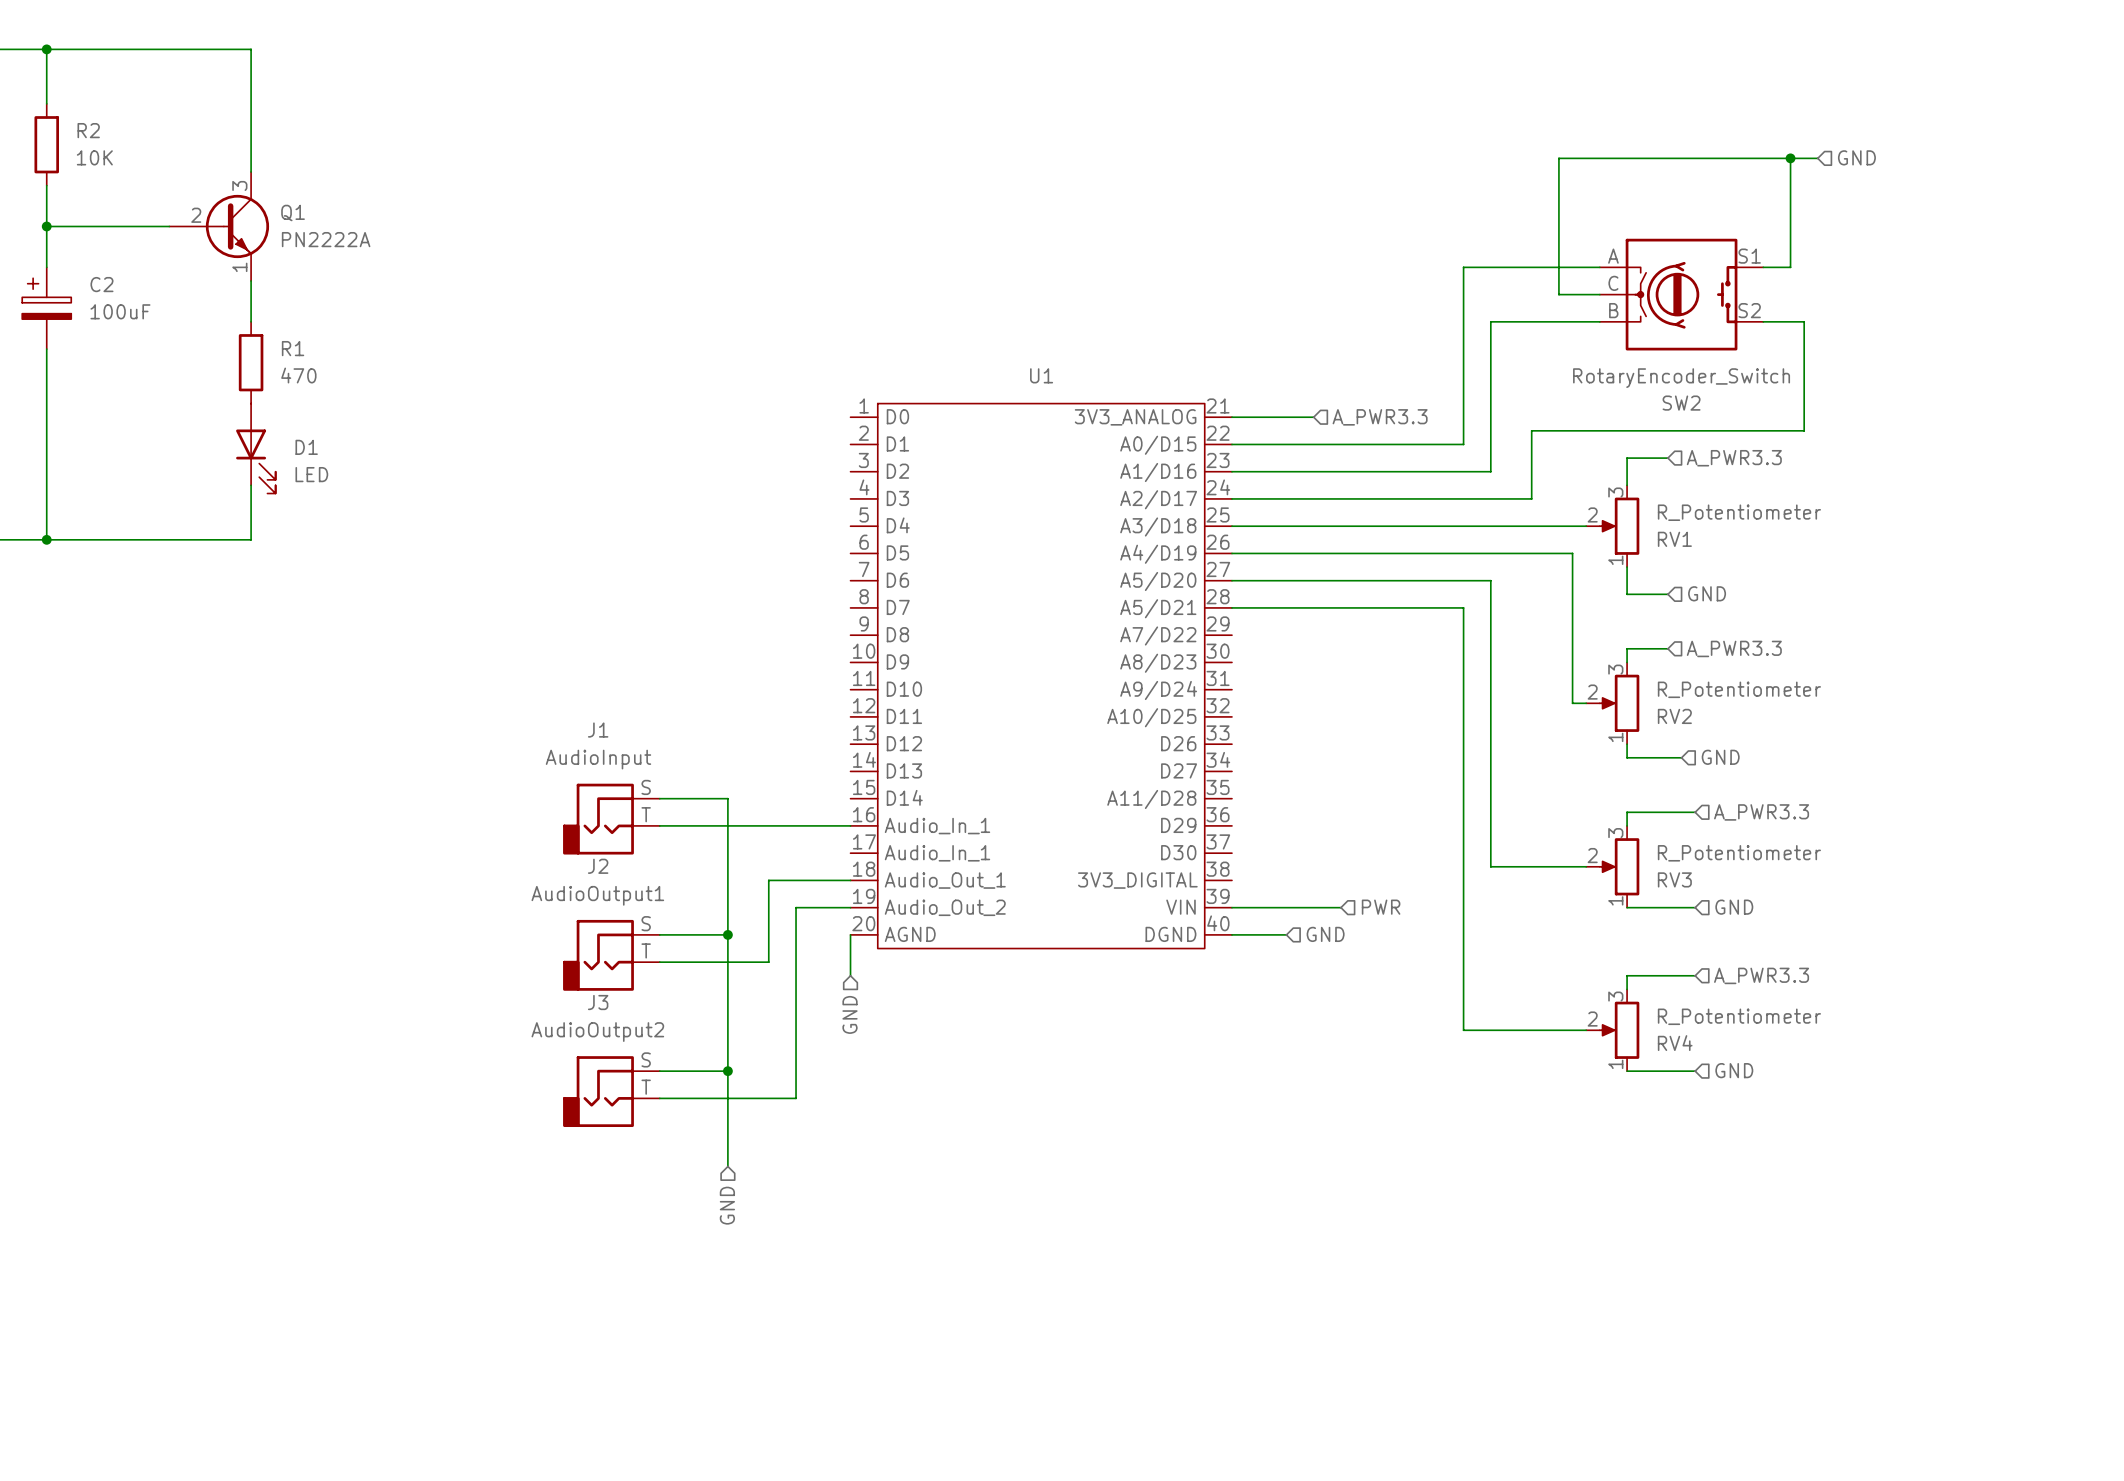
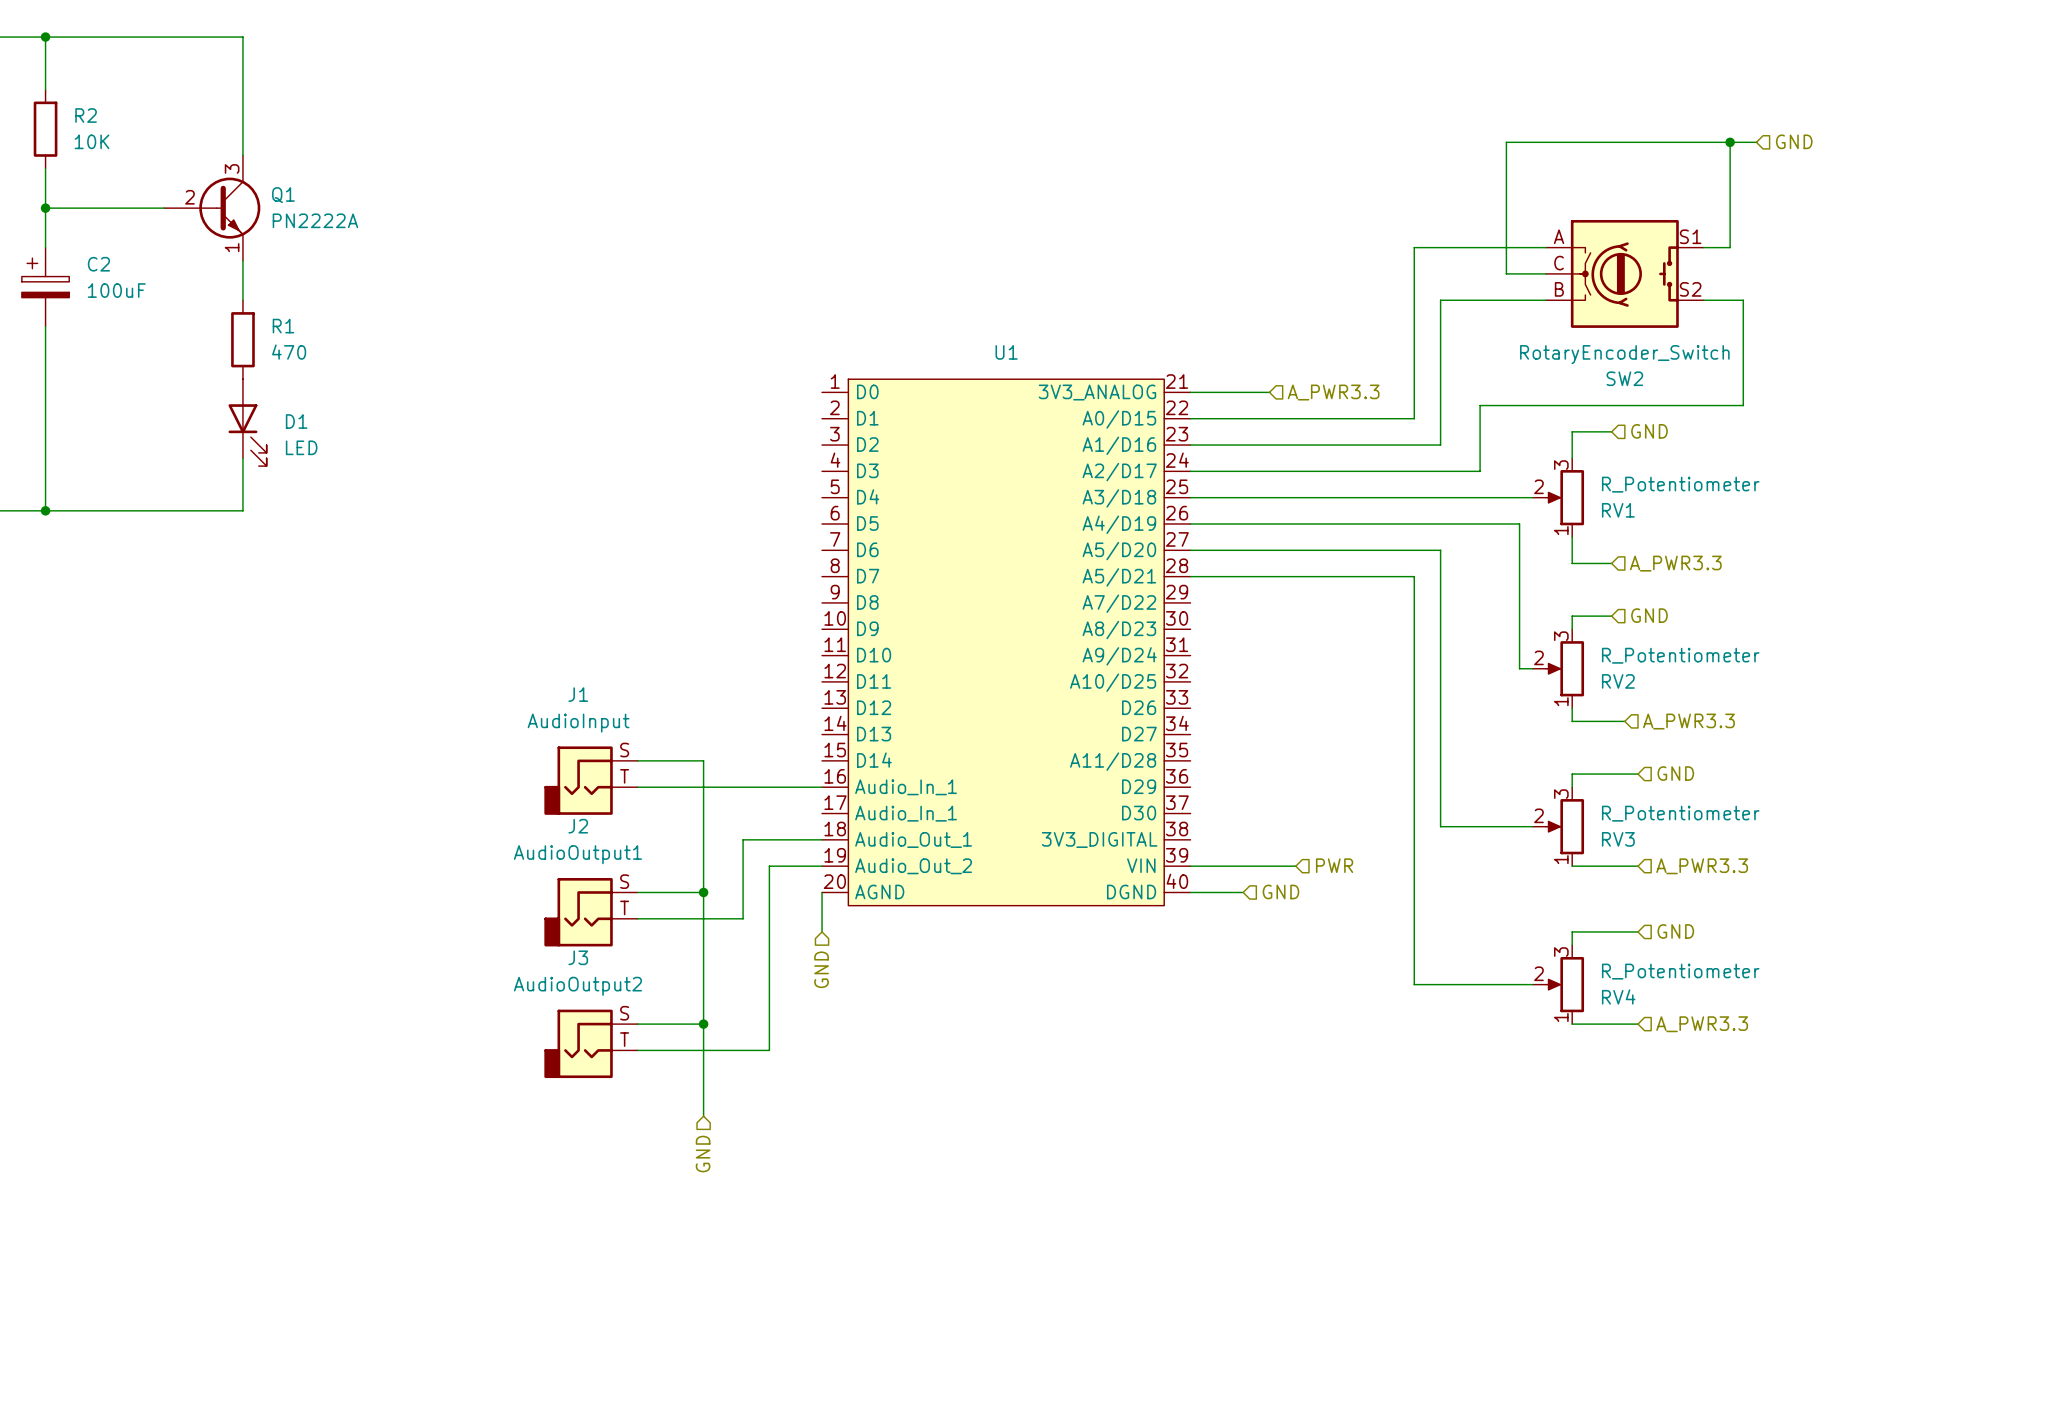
hierarchical label: A_PWR3.3 (1734, 458) -> GND (1649, 431)
hierarchical label: GND (1707, 593) -> A_PWR3.3 (1675, 563)
hierarchical label: A_PWR3.3 (1734, 648) -> GND (1649, 615)
hierarchical label: GND (1720, 757) -> A_PWR3.3 (1688, 721)
hierarchical label: A_PWR3.3 (1761, 812) -> GND (1675, 773)
hierarchical label: GND (1734, 907) -> A_PWR3.3 (1702, 866)
hierarchical label: A_PWR3.3 (1761, 975) -> GND (1675, 931)
hierarchical label: GND (1734, 1070) -> A_PWR3.3 (1702, 1024)

